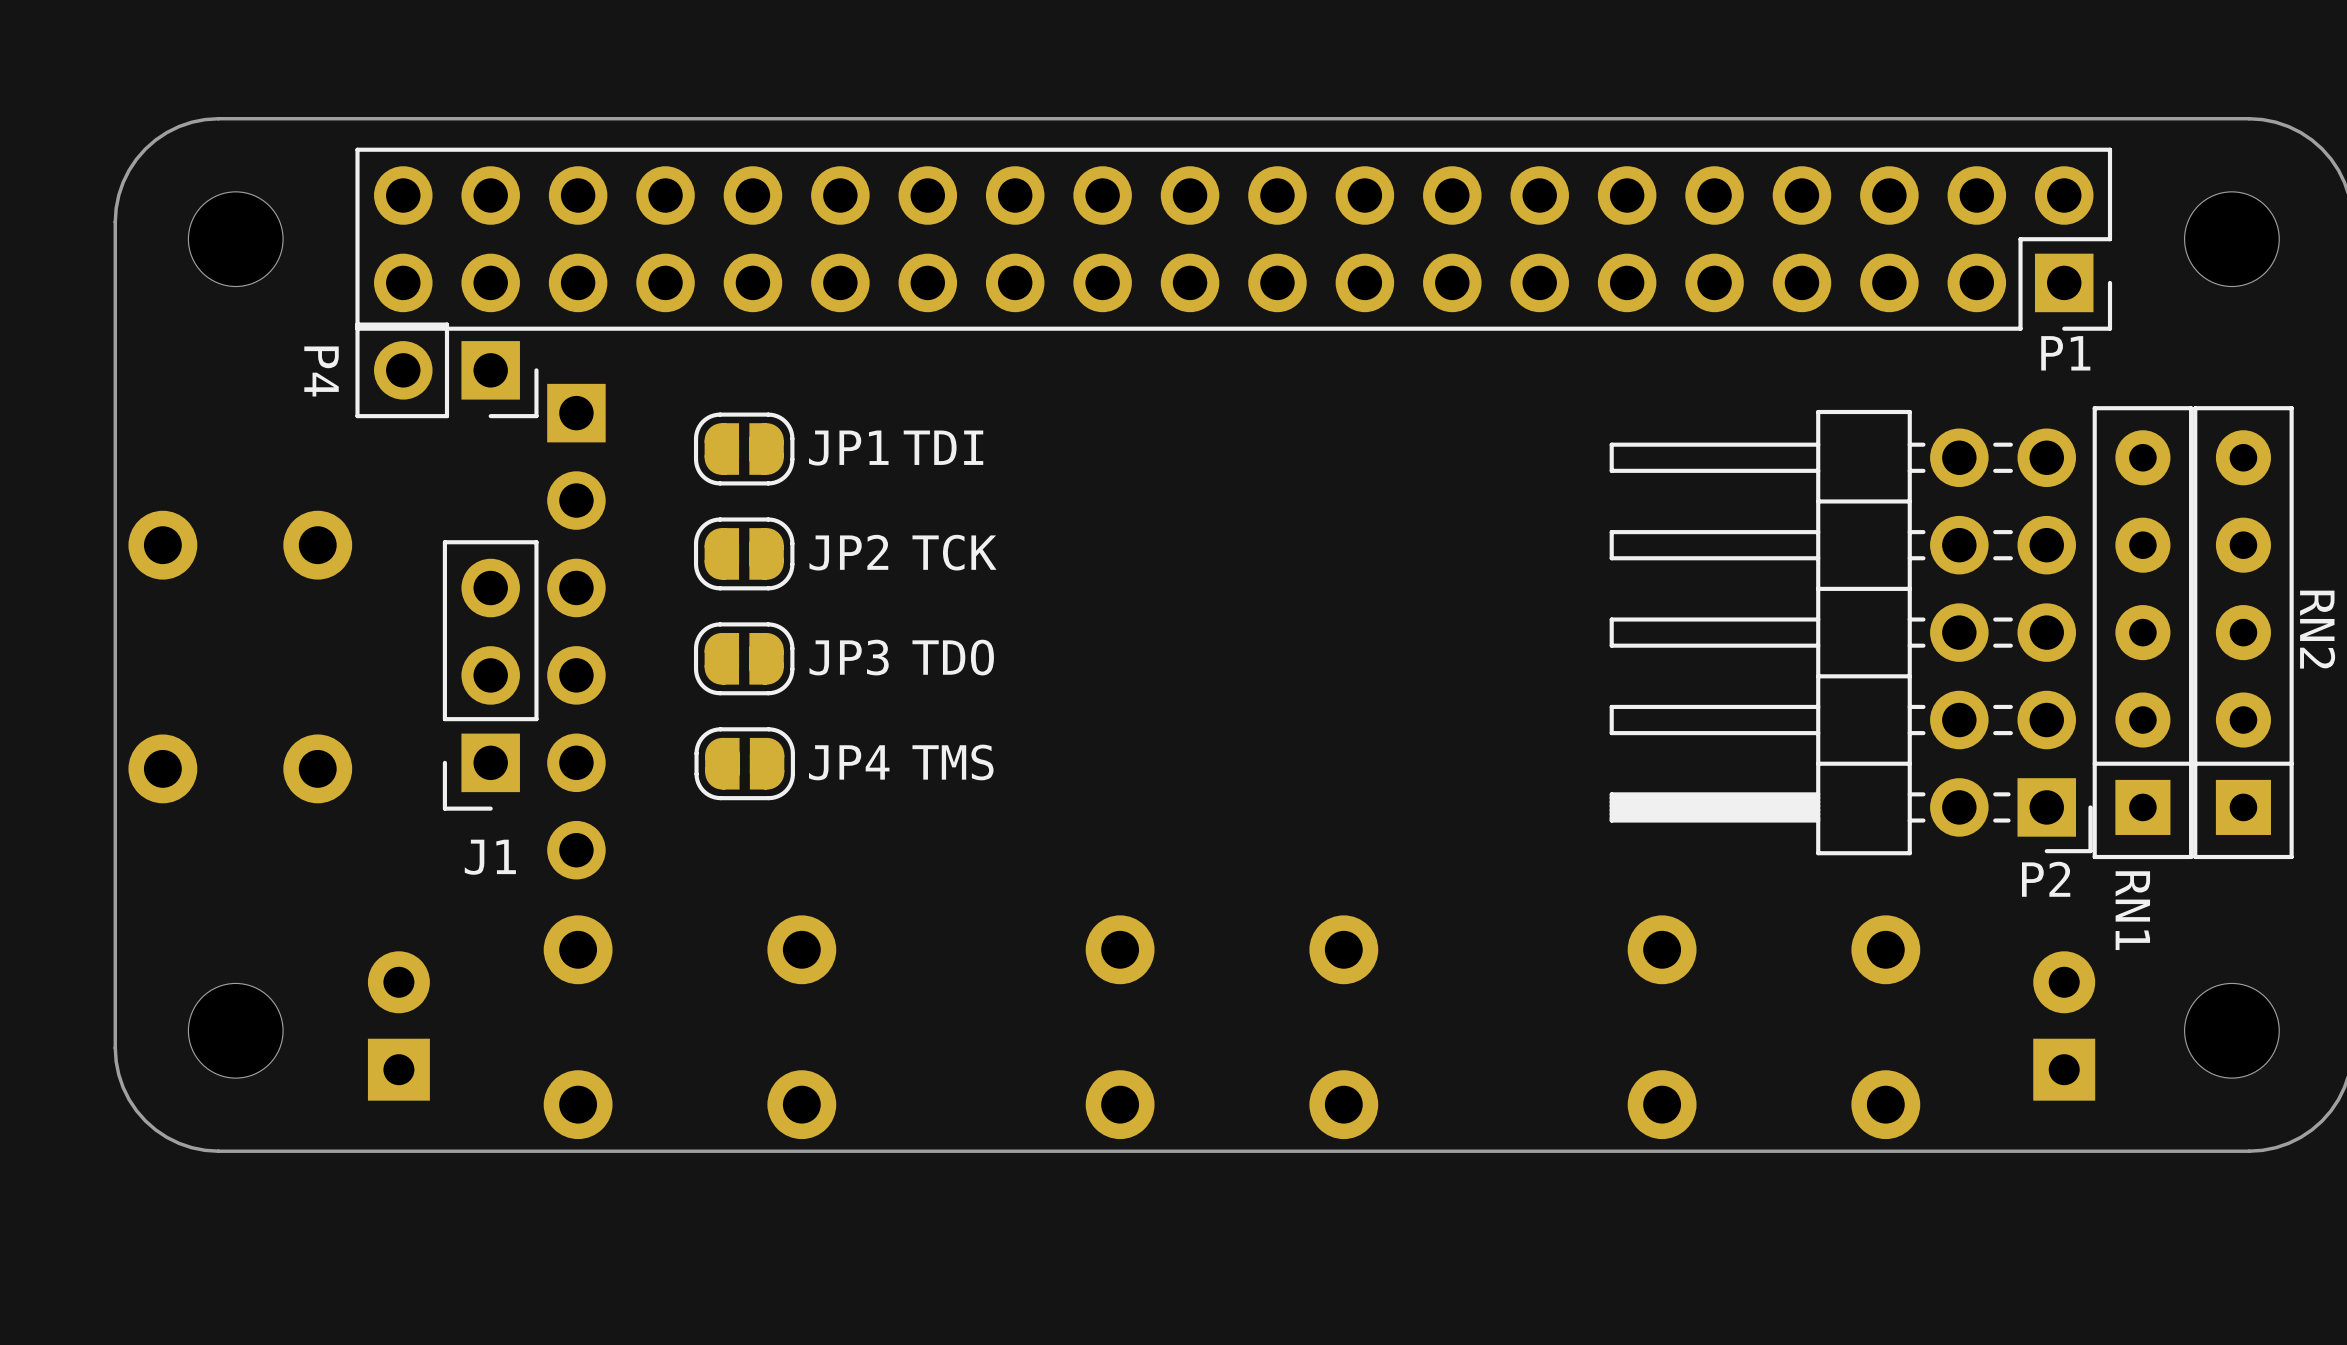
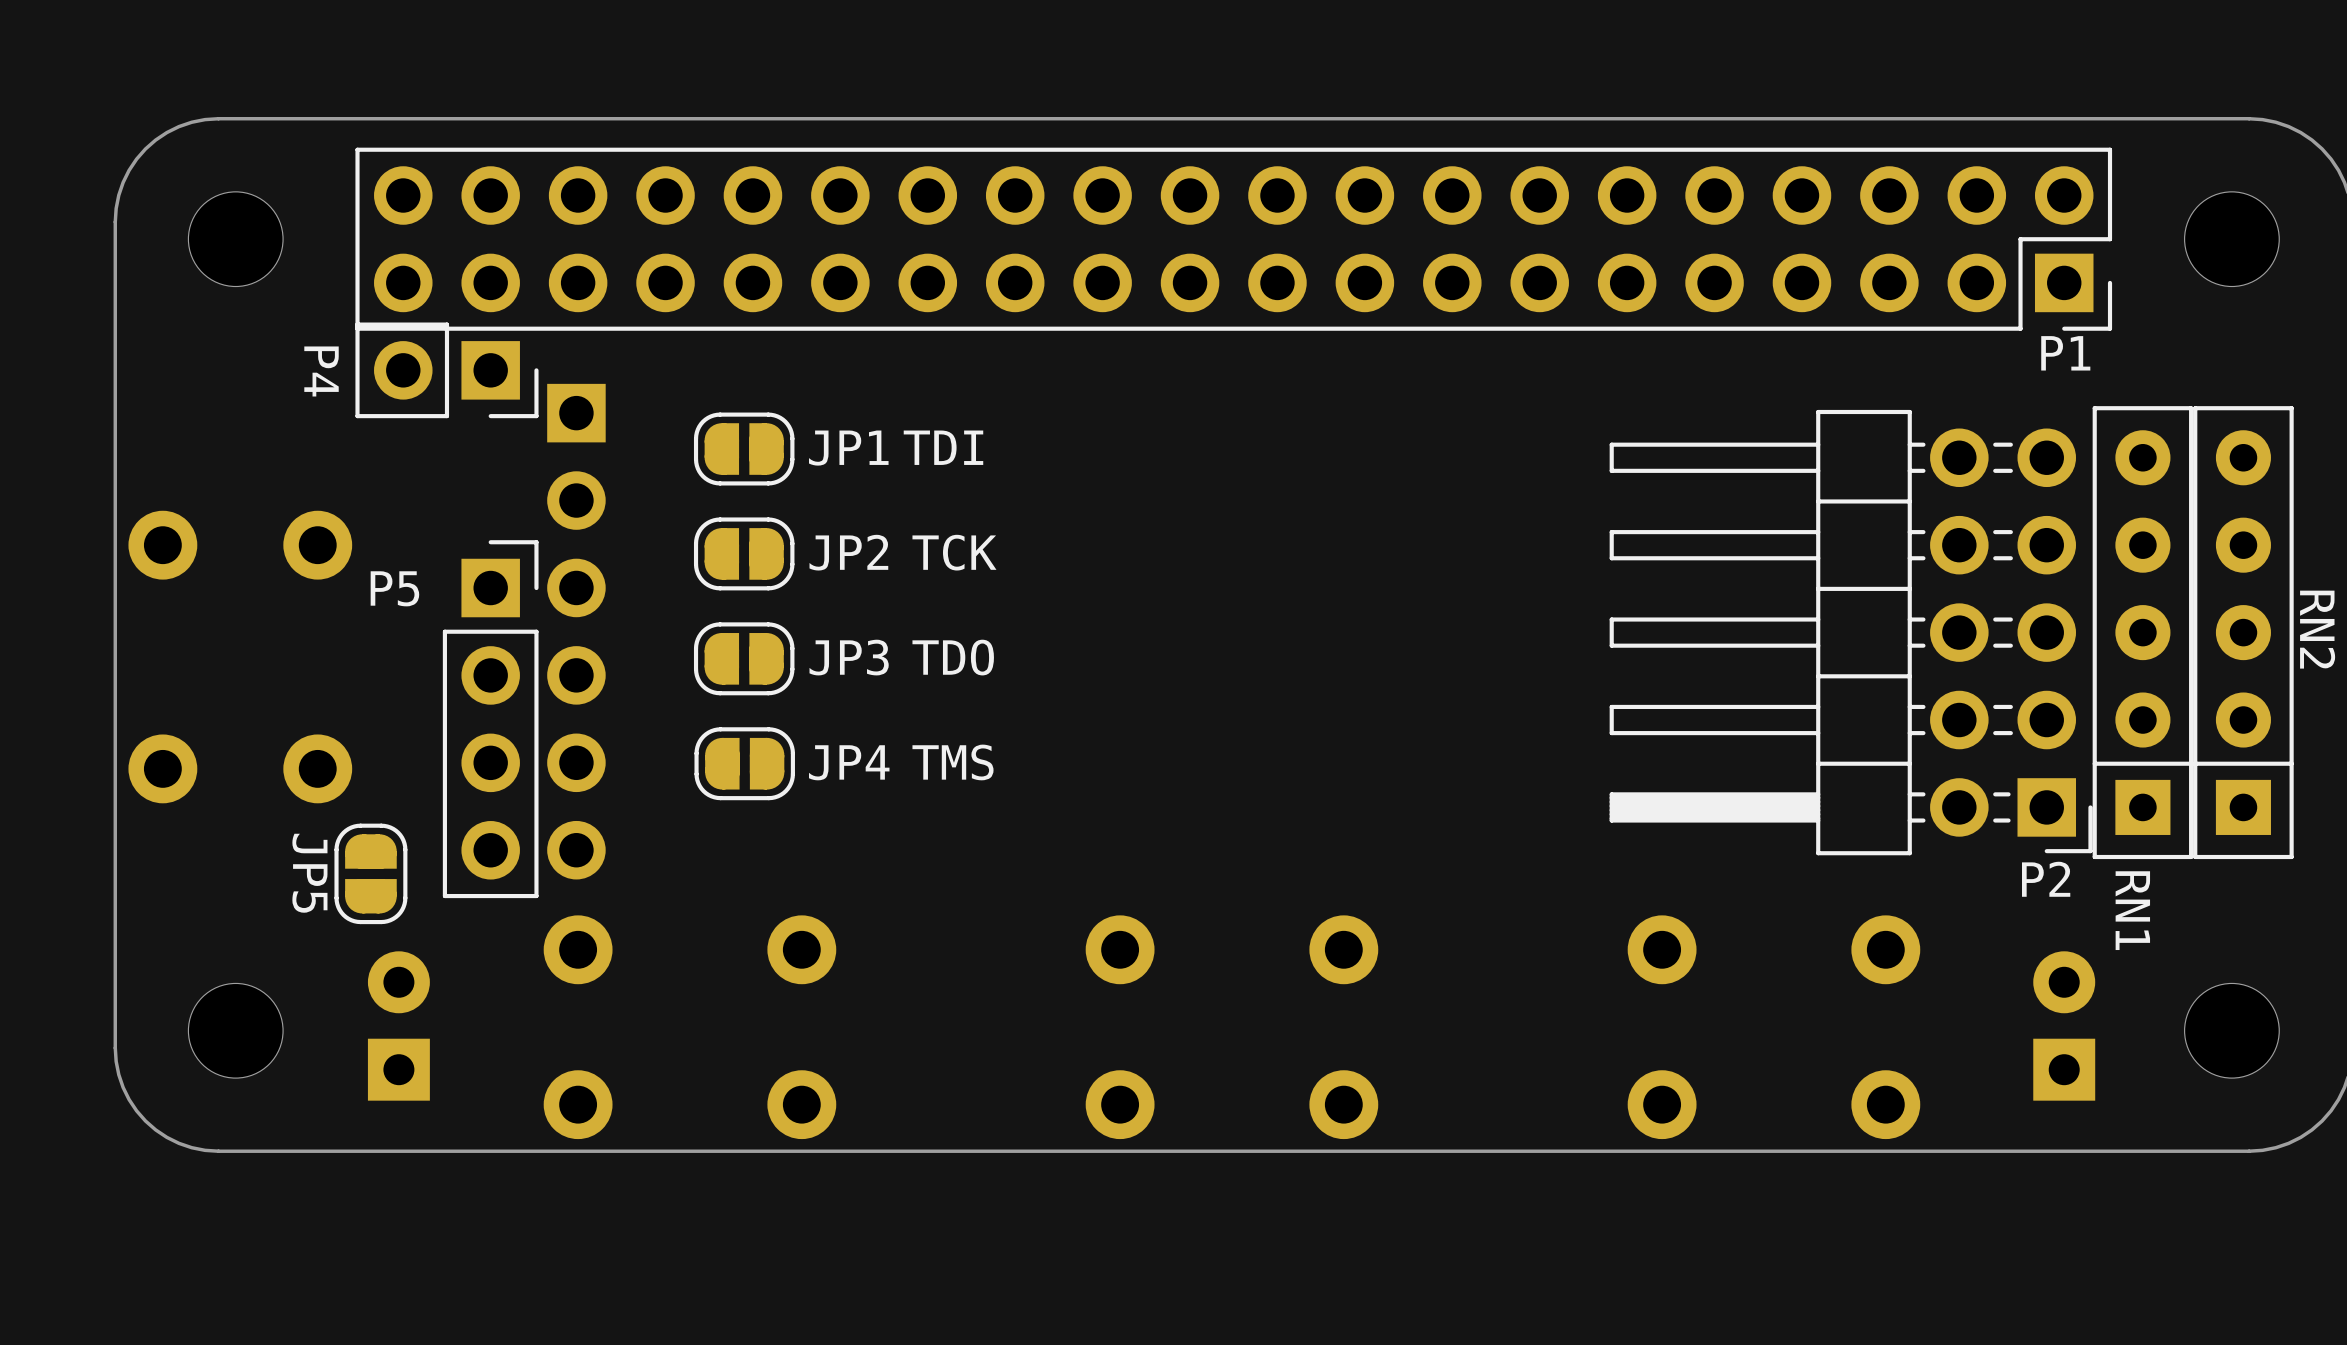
J1: (490, 675) -> none
P5: none -> (490, 719)
JP5: none -> (370, 873)

